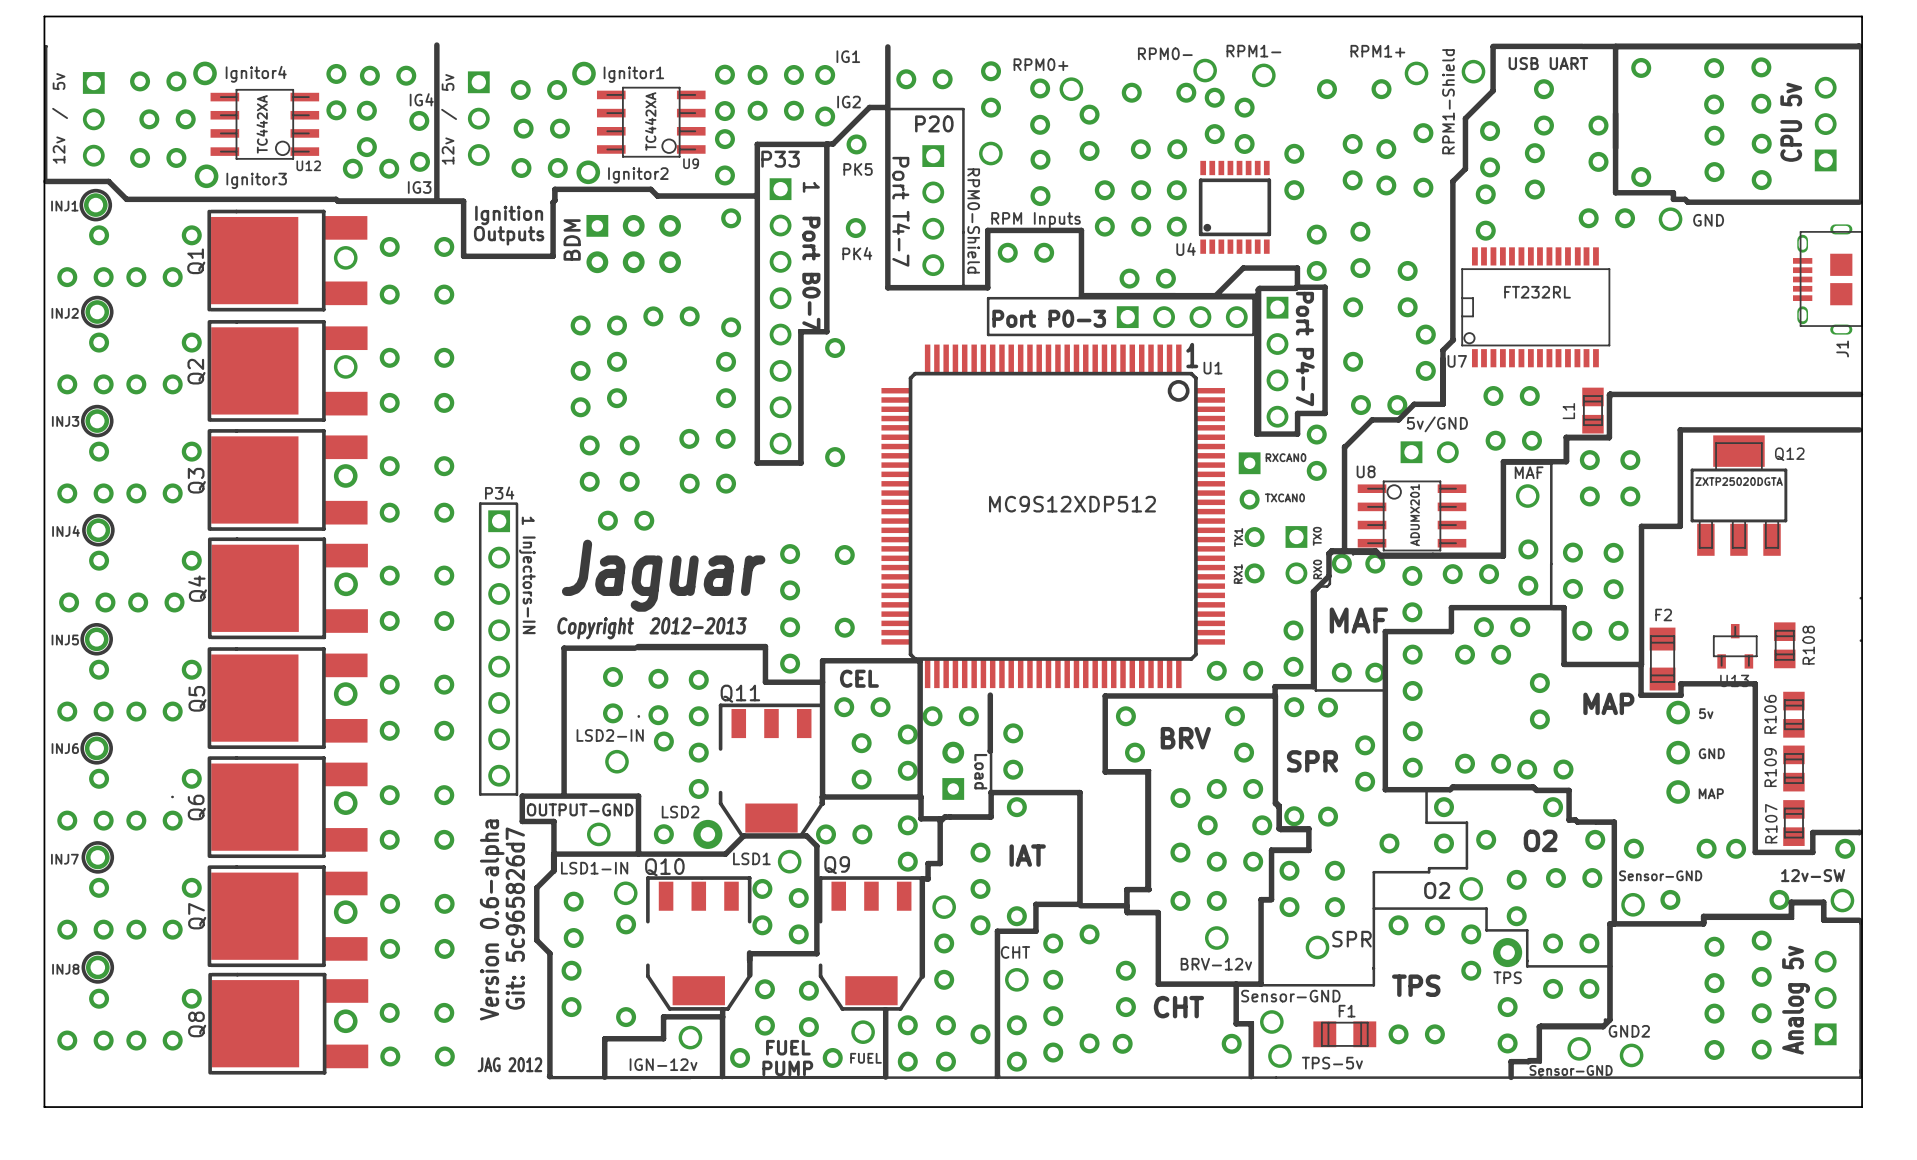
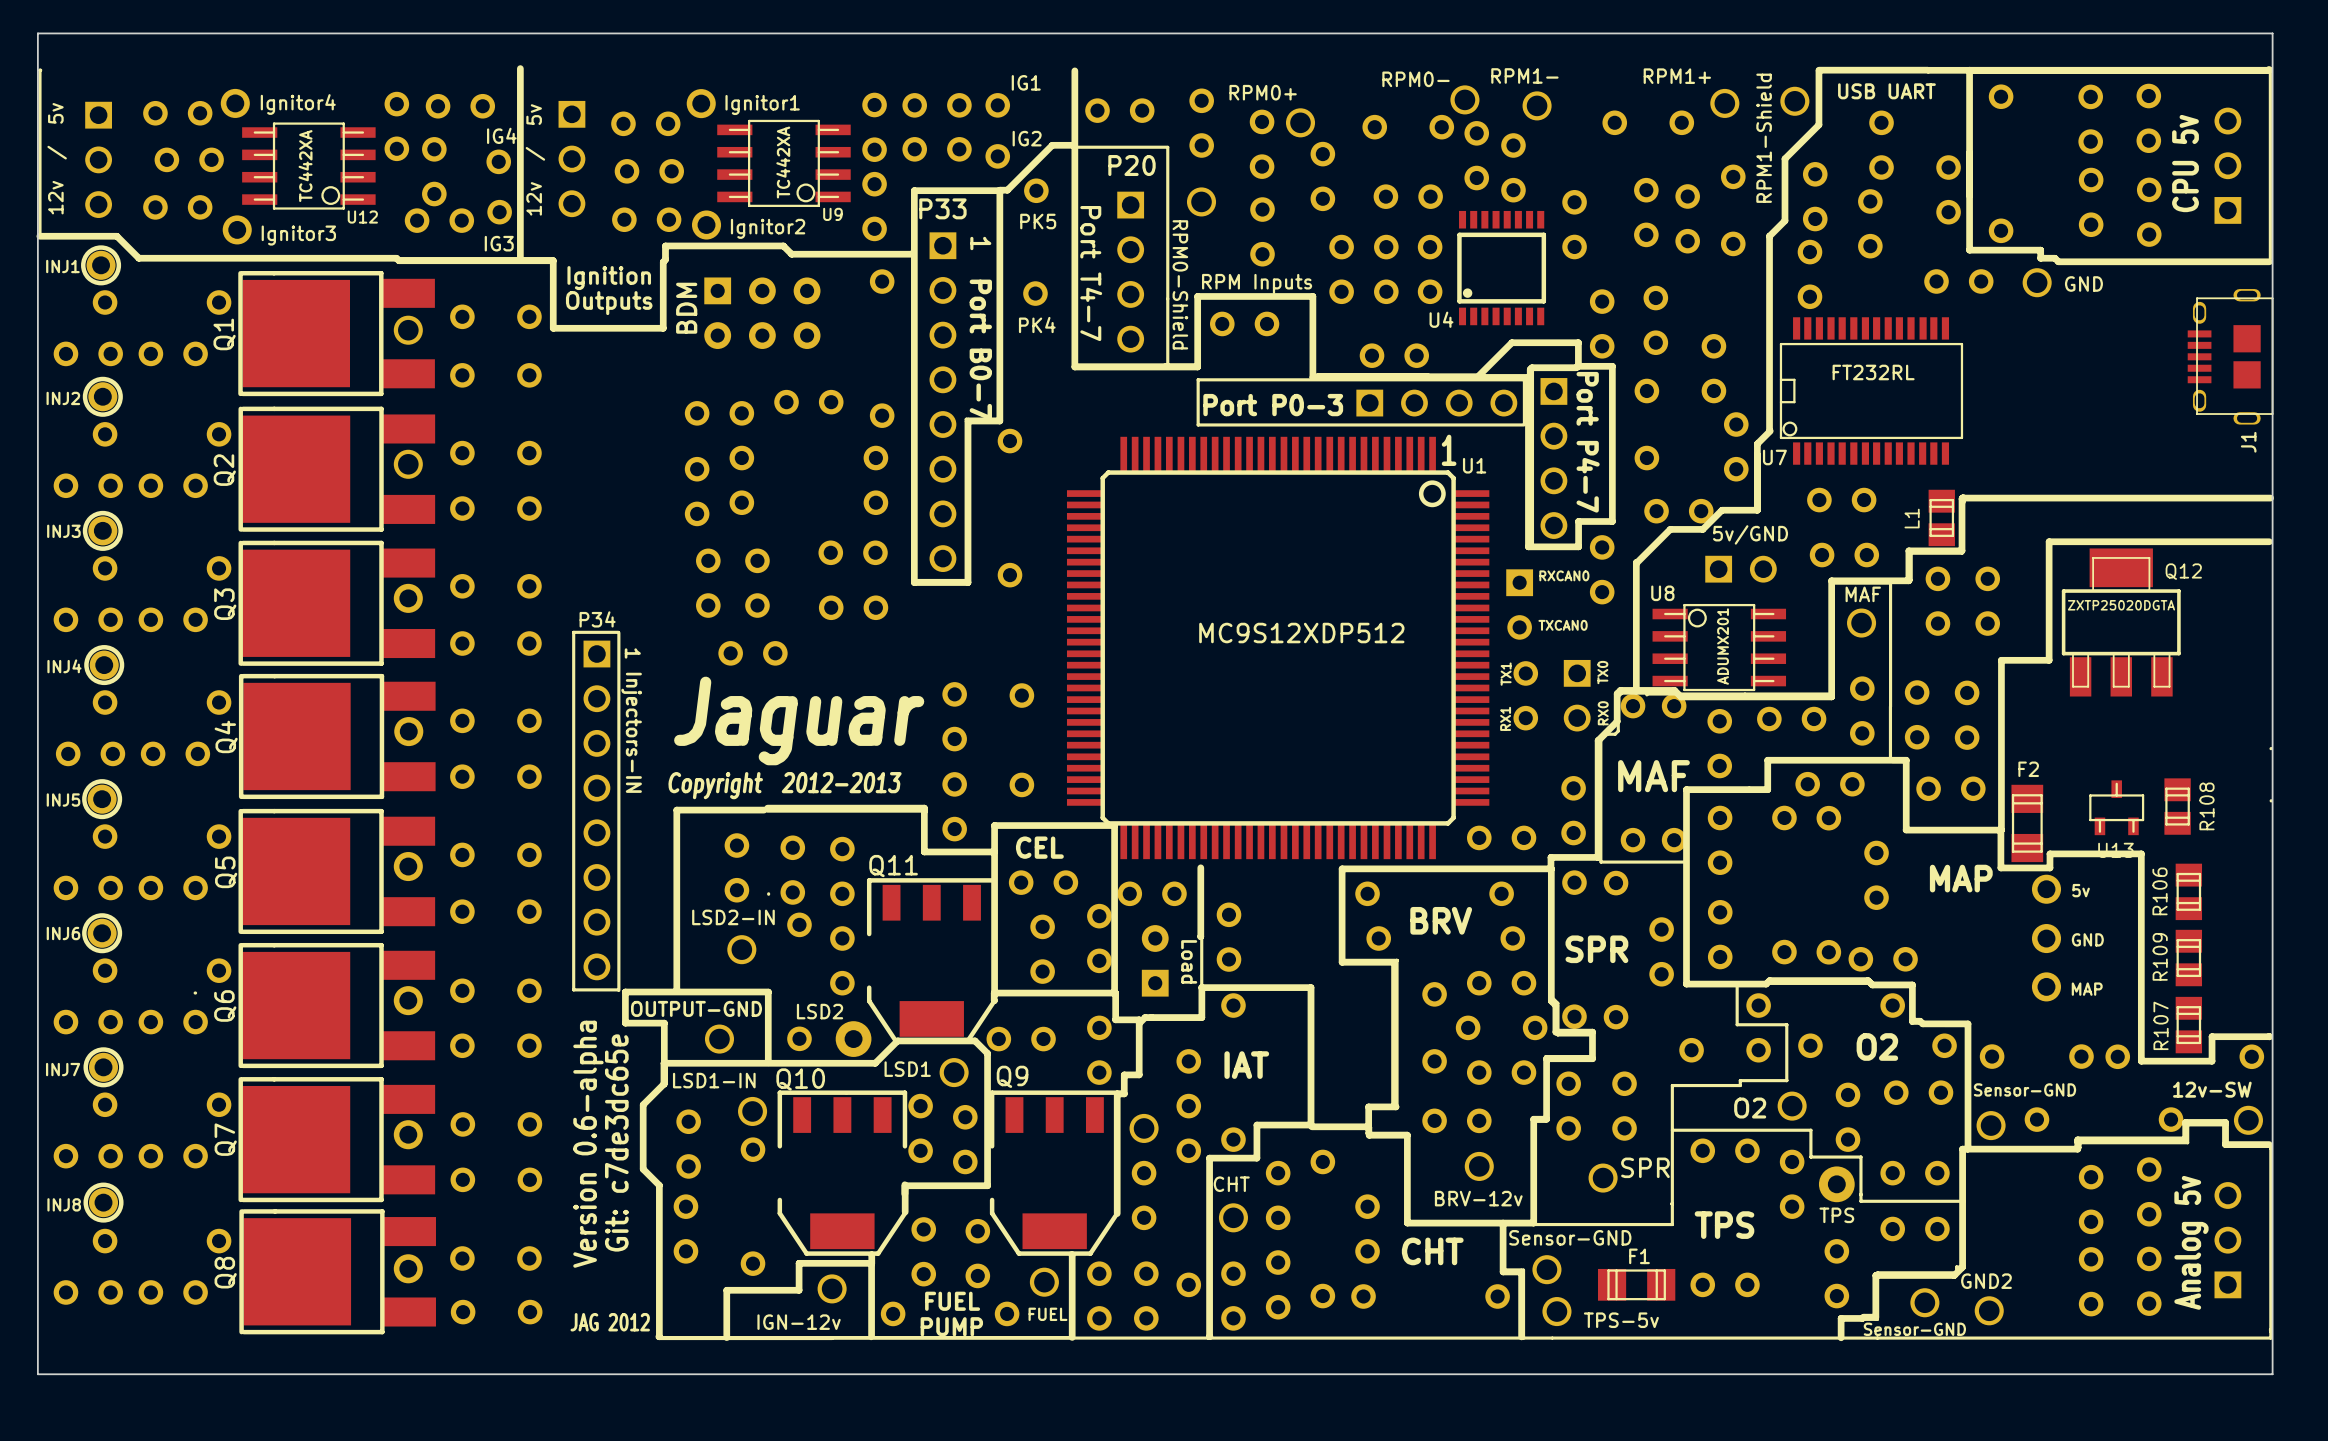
text: Git: 5c965826d7 (515, 918) -> Git: c7de3dc65e (616, 1142)

